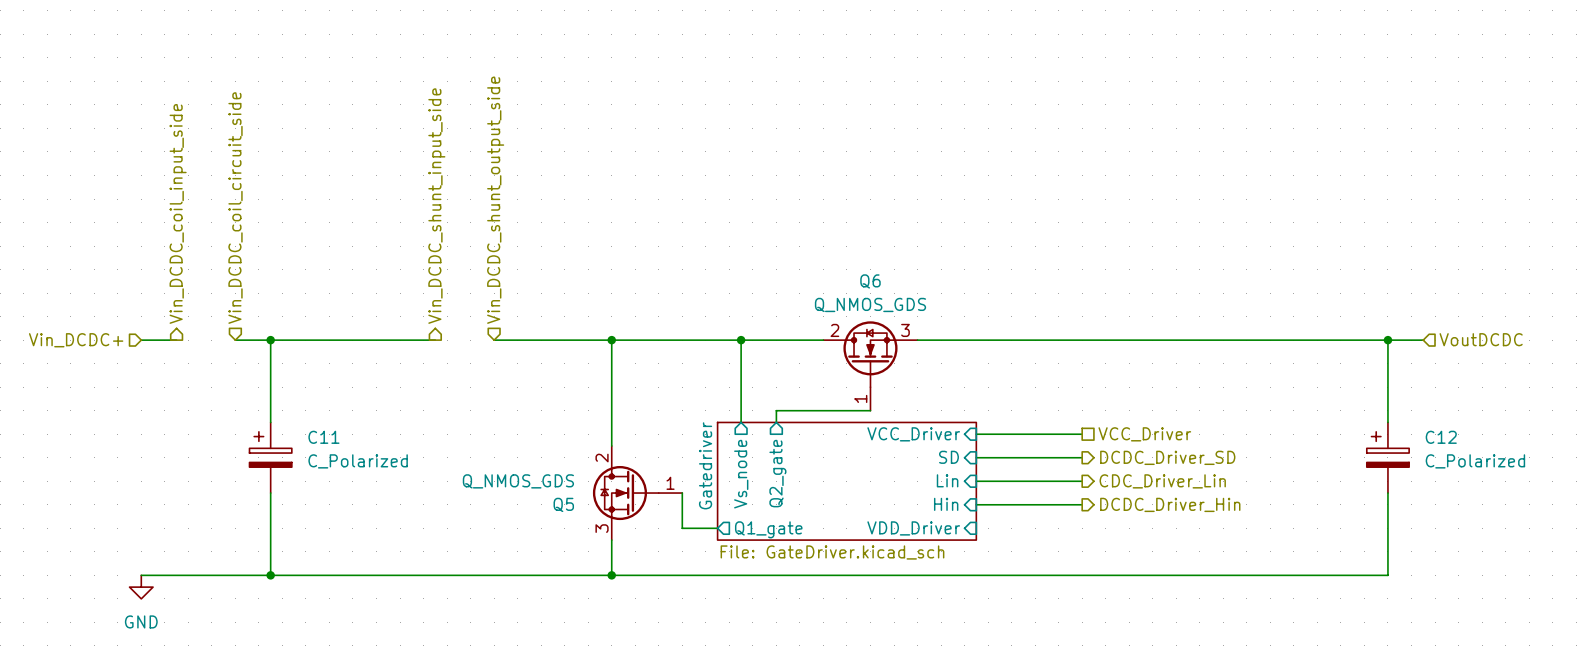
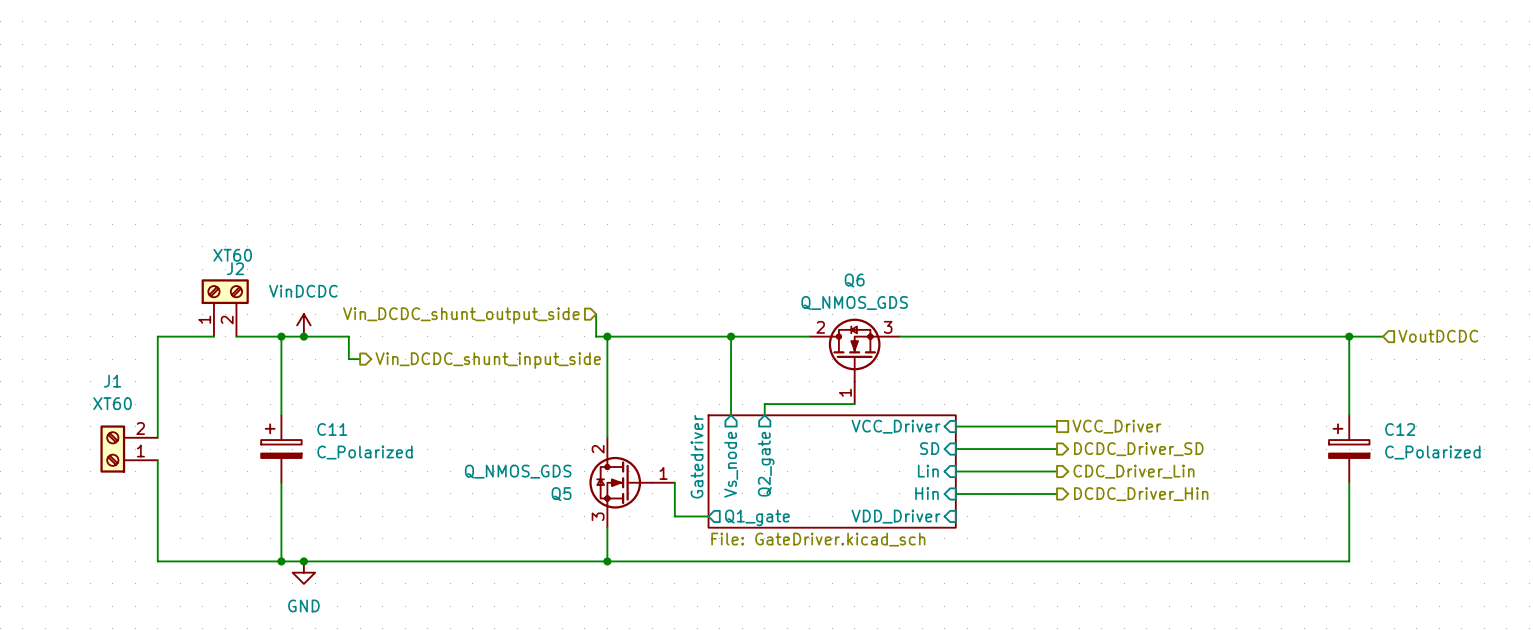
hierarchical label rotation: 0° (495, 200) -> 90° counterclockwise (461, 315)
hierarchical label rotation: 0° (436, 206) -> 90° clockwise (488, 360)
hierarchical label: Vin_DCDC_coil_circuit_side (235, 208) -> none
hierarchical label: Vin_DCDC_coil_input_side (178, 213) -> none
J2: none -> XT60 (225, 307)
power symbol: none -> VinDCDC (303, 325)
hierarchical label: Vin_DCDC+ (76, 340) -> none
wire: none -> (157, 336) (157, 437)
wire: none -> (191, 336) (213, 336)
wire: none -> (236, 336) (247, 336)
junction: none -> (303, 336)
wire: (341, 340) (435, 340) -> (348, 336) (348, 359) (360, 359)
wire: (494, 340) (599, 340) -> (596, 314) (596, 336)
J1: none -> XT60 (129, 449)
wire: none -> (157, 460) (157, 561)
junction: none -> (303, 561)
power symbol position: GND (141, 587) -> GND (303, 572)

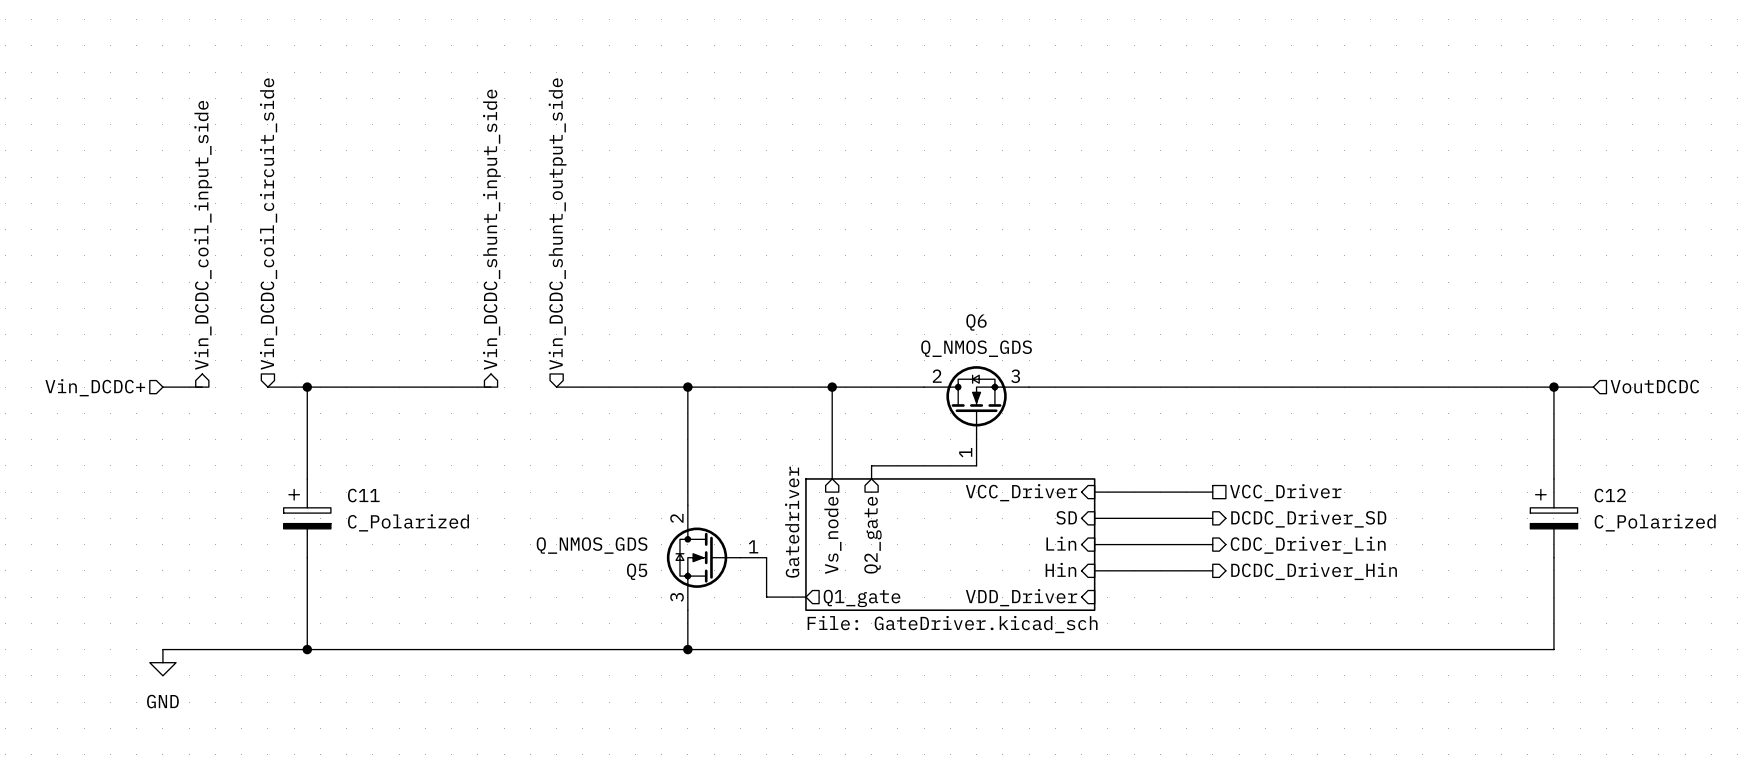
hierarchical label: none -> Vin_DCDC_coil_circuit_side (268, 224)
hierarchical label: none -> Vin_DCDC_coil_input_side (203, 235)
J2: XT60 (225, 307) -> none
wire: (596, 314) (596, 336) -> (556, 387) (674, 387)
hierarchical label rotation: 0° (461, 315) -> 90° clockwise (557, 224)
power symbol: VinDCDC (303, 325) -> none
hierarchical label: none -> Vin_DCDC+ (95, 387)
wire: (157, 336) (157, 437) -> none
wire: (191, 336) (213, 336) -> none
wire: (236, 336) (247, 336) -> none
junction: (303, 336) -> none
wire: (348, 336) (348, 359) (360, 359) -> (386, 387) (491, 387)
hierarchical label rotation: 0° (488, 360) -> 90° counterclockwise (491, 229)
J1: XT60 (129, 449) -> none
wire: (157, 460) (157, 561) -> none
junction: (303, 561) -> none
power symbol position: GND (303, 572) -> GND (162, 662)

